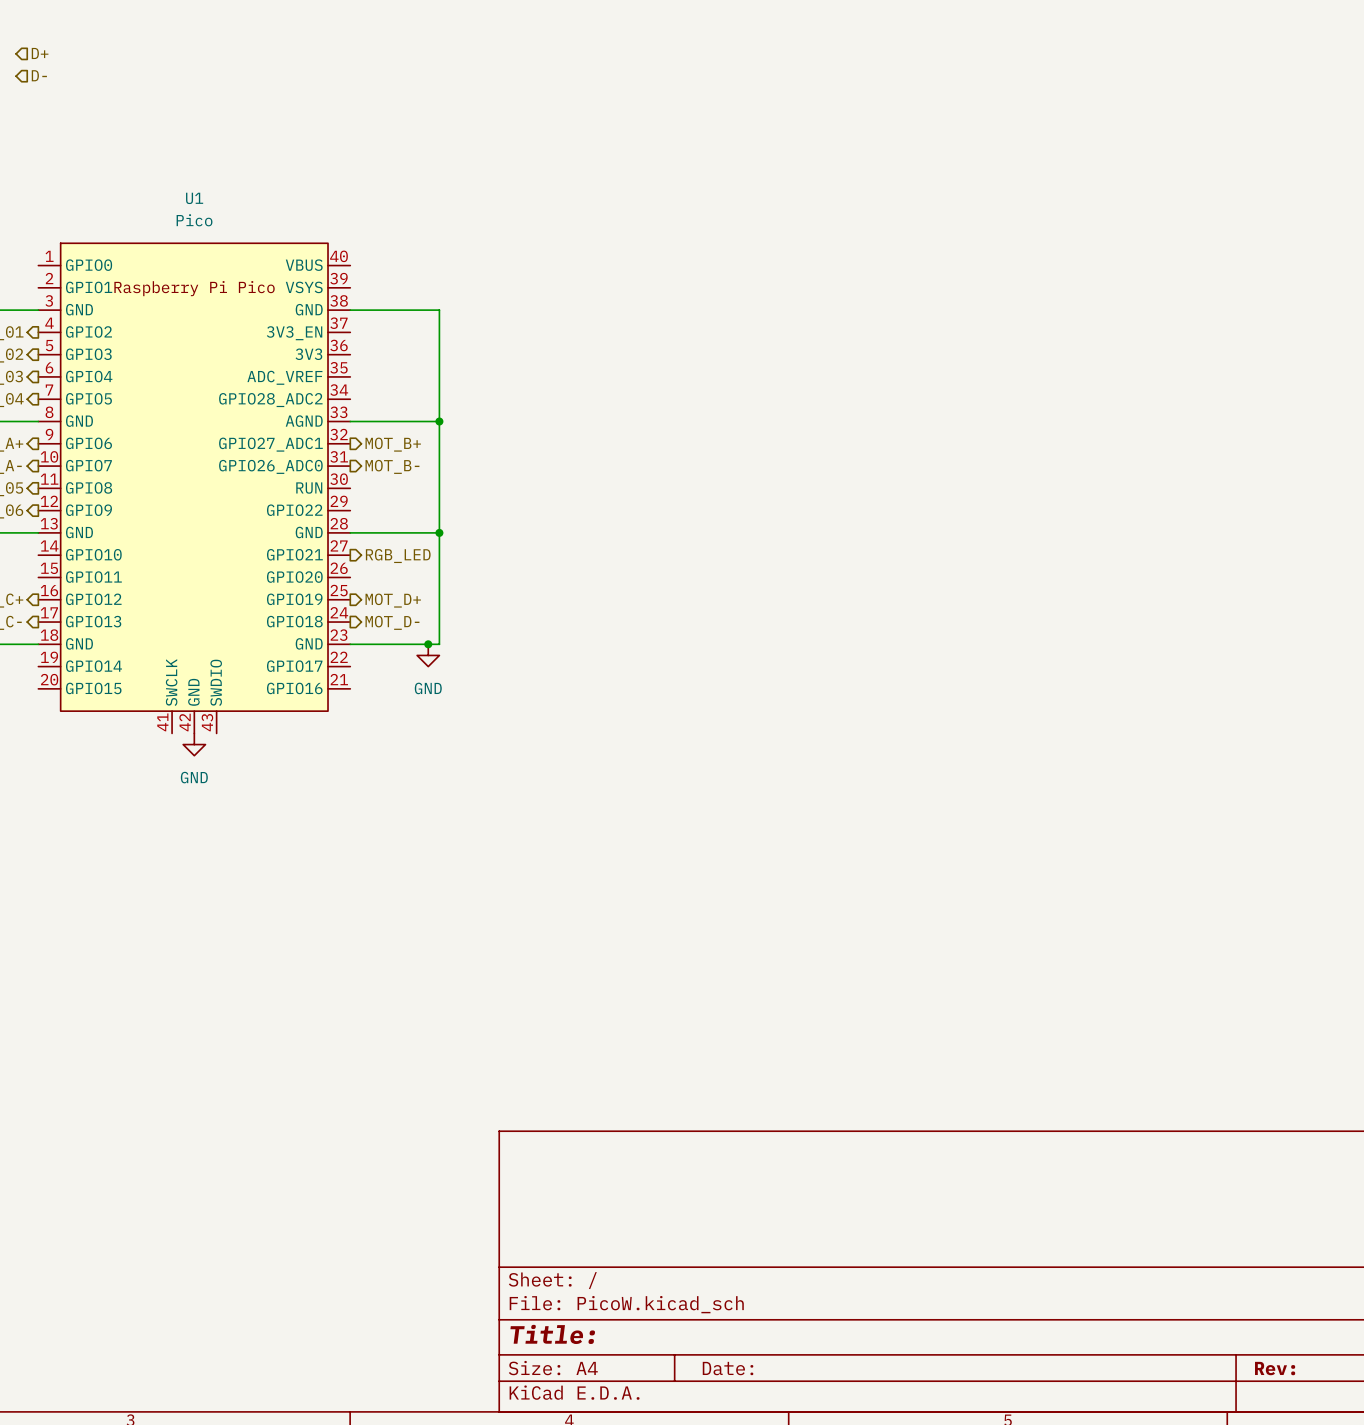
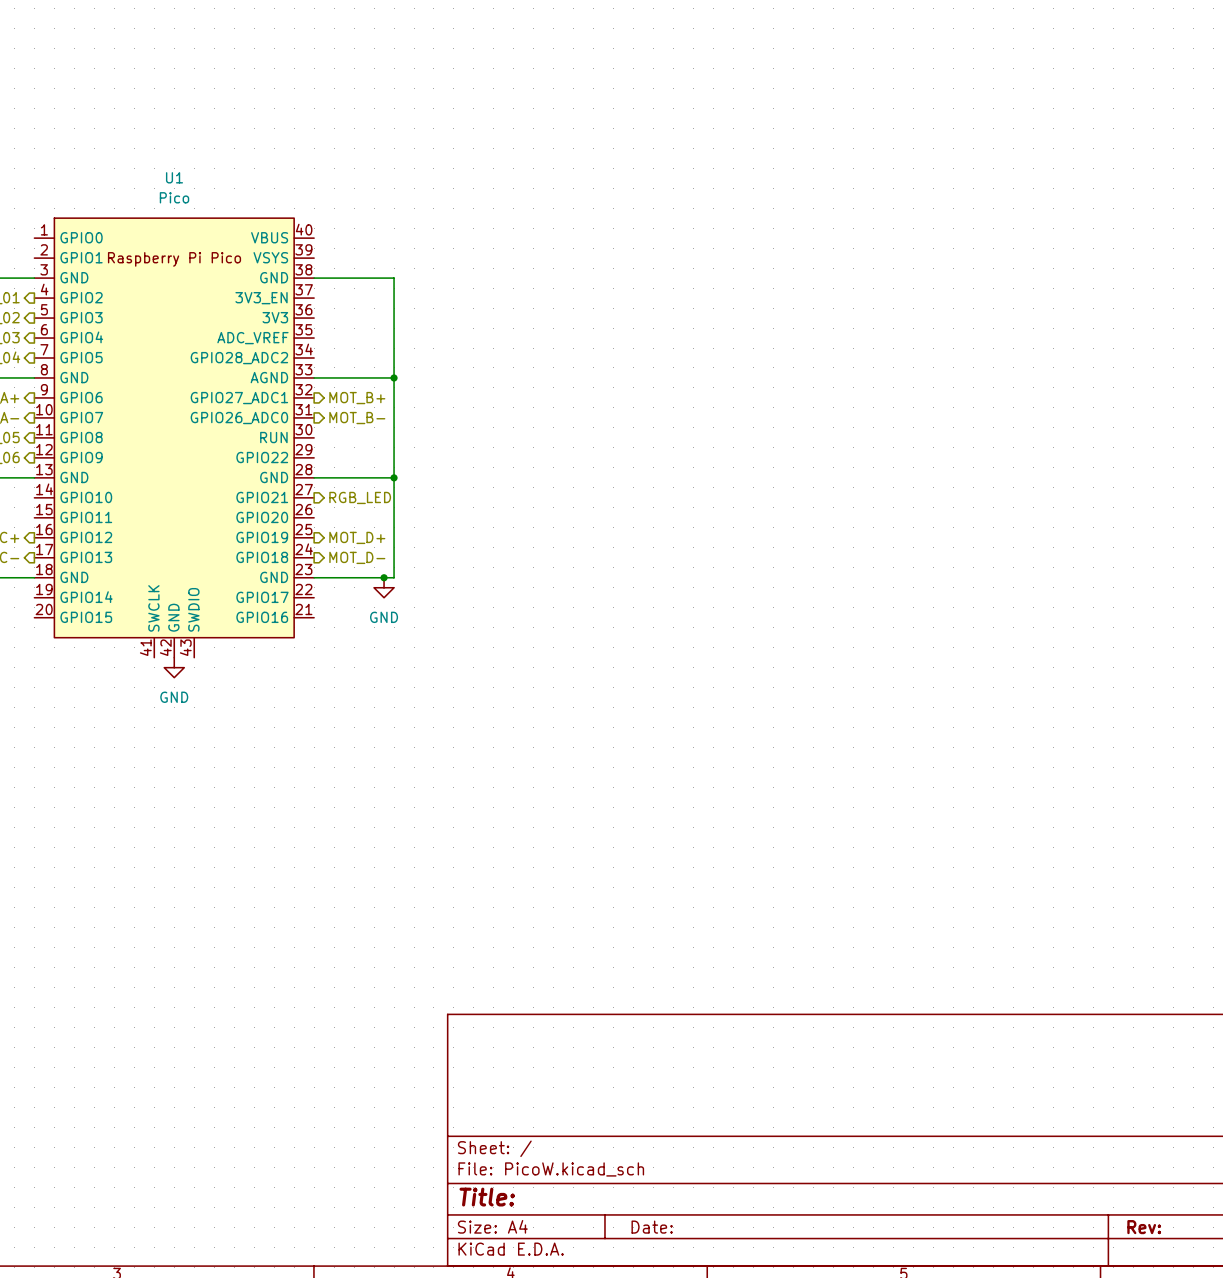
hierarchical label: D+ (40, 53) -> none
hierarchical label: D- (39, 75) -> none

